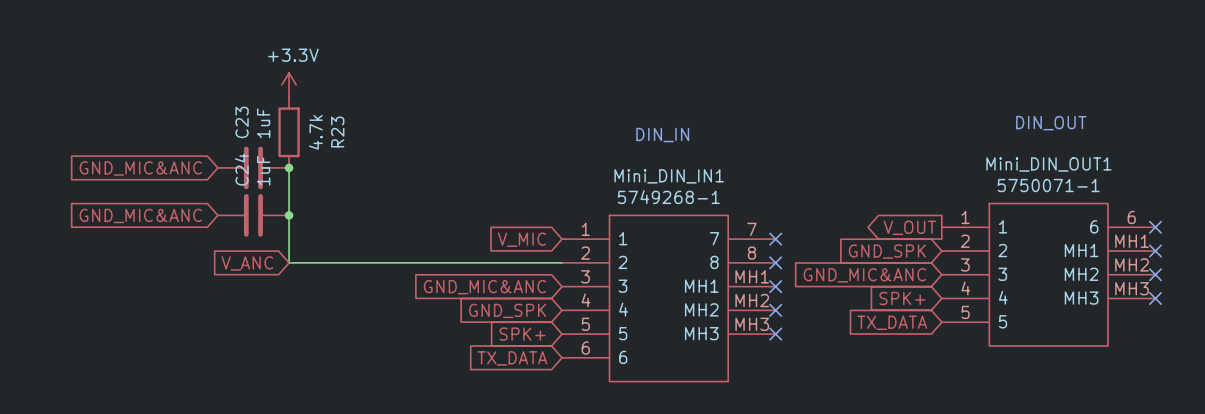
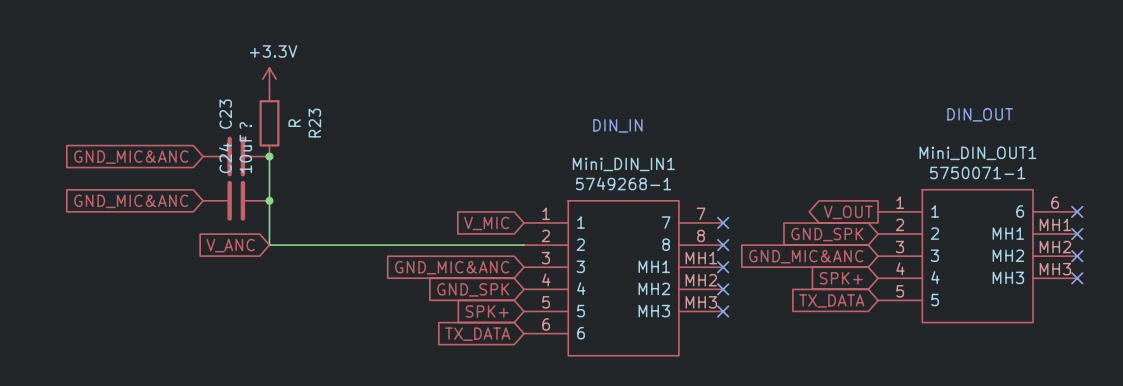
C23 value: 1uF (263, 123) -> ? (245, 125)
R23 value: 4.7k (315, 132) -> R (294, 123)
C24 value: 1uF (263, 170) -> 10uF (245, 153)

